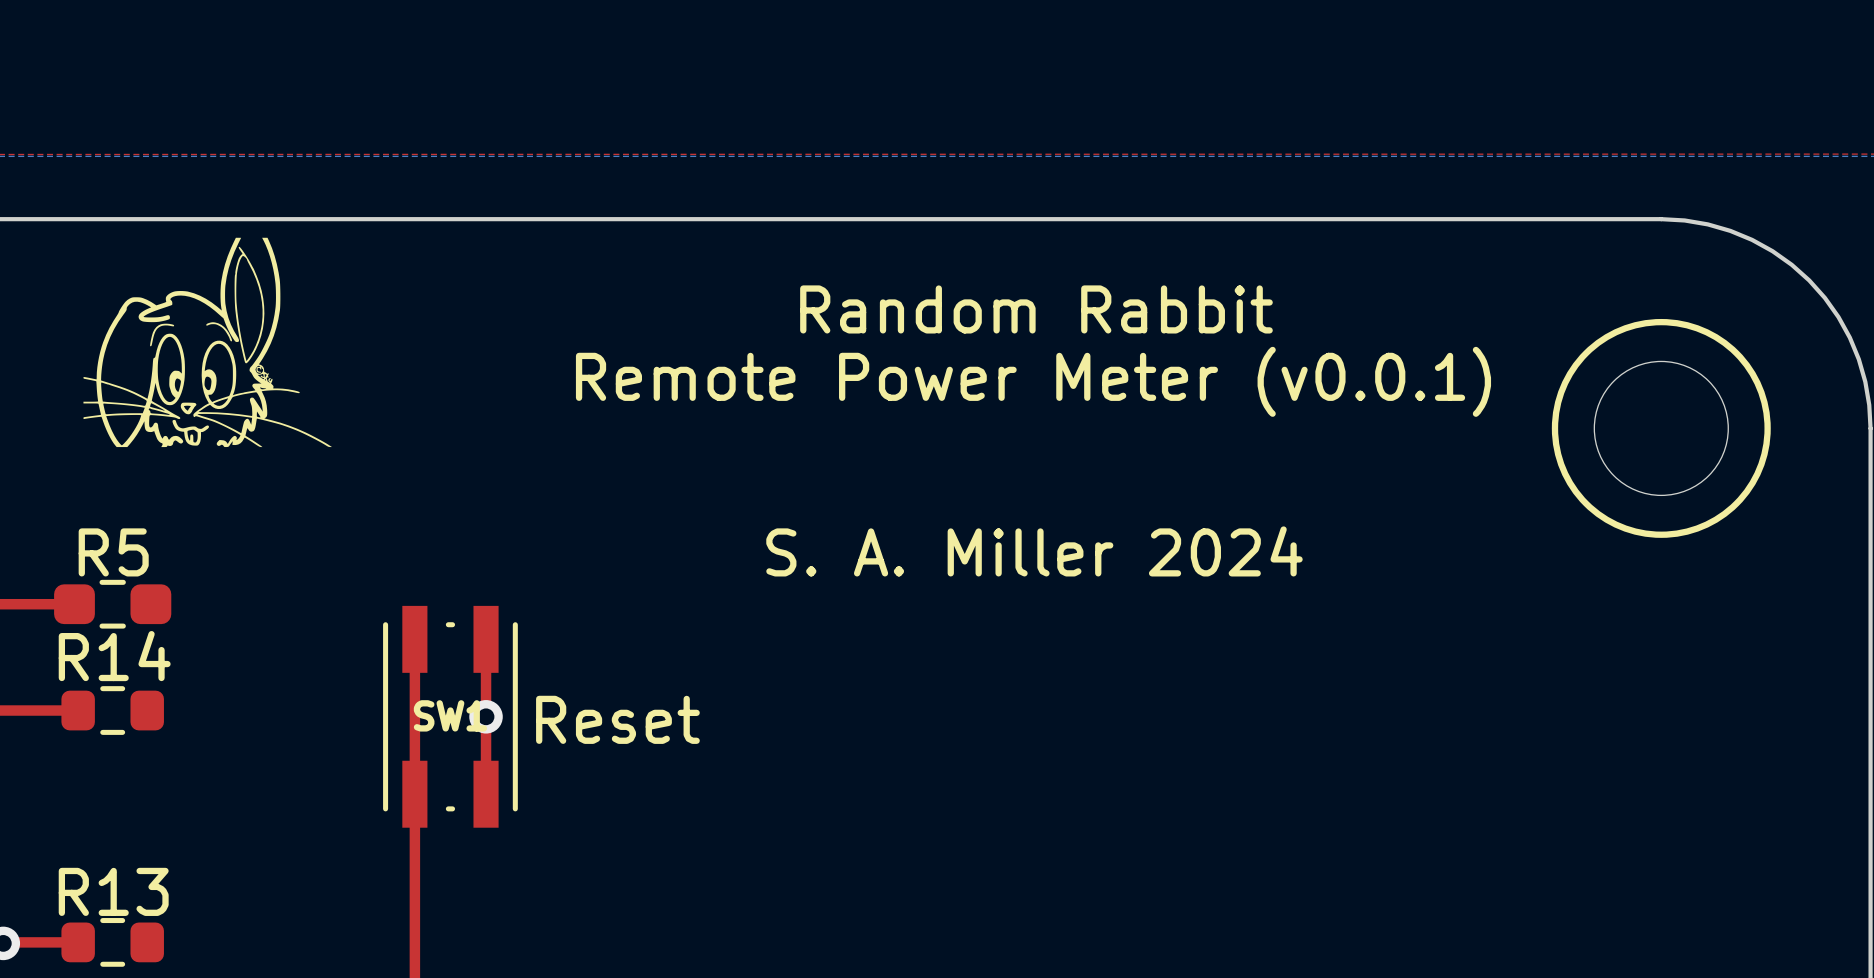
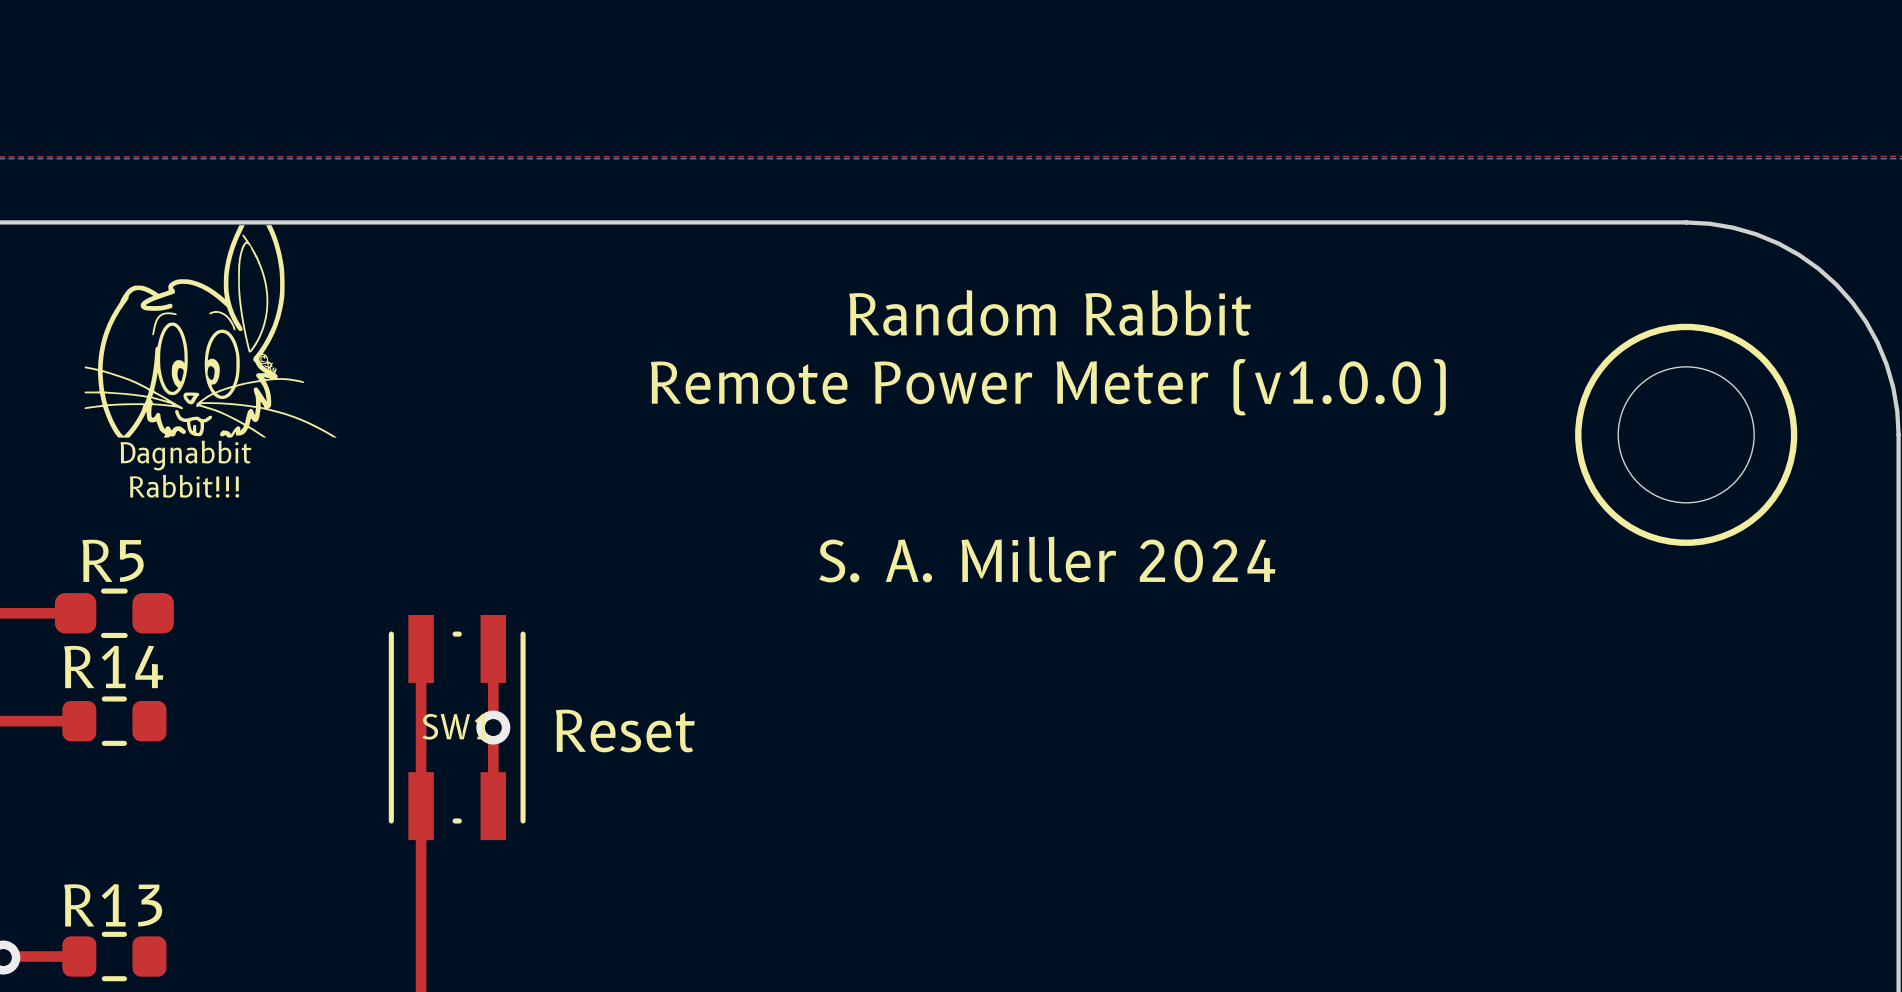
drawing shape: [83, 237, 332, 448] -> [84, 225, 337, 498]
text: Remote Power Meter (v0.0.1) (1033, 381) -> Remote Power Meter (v1.0.0) (1048, 387)

